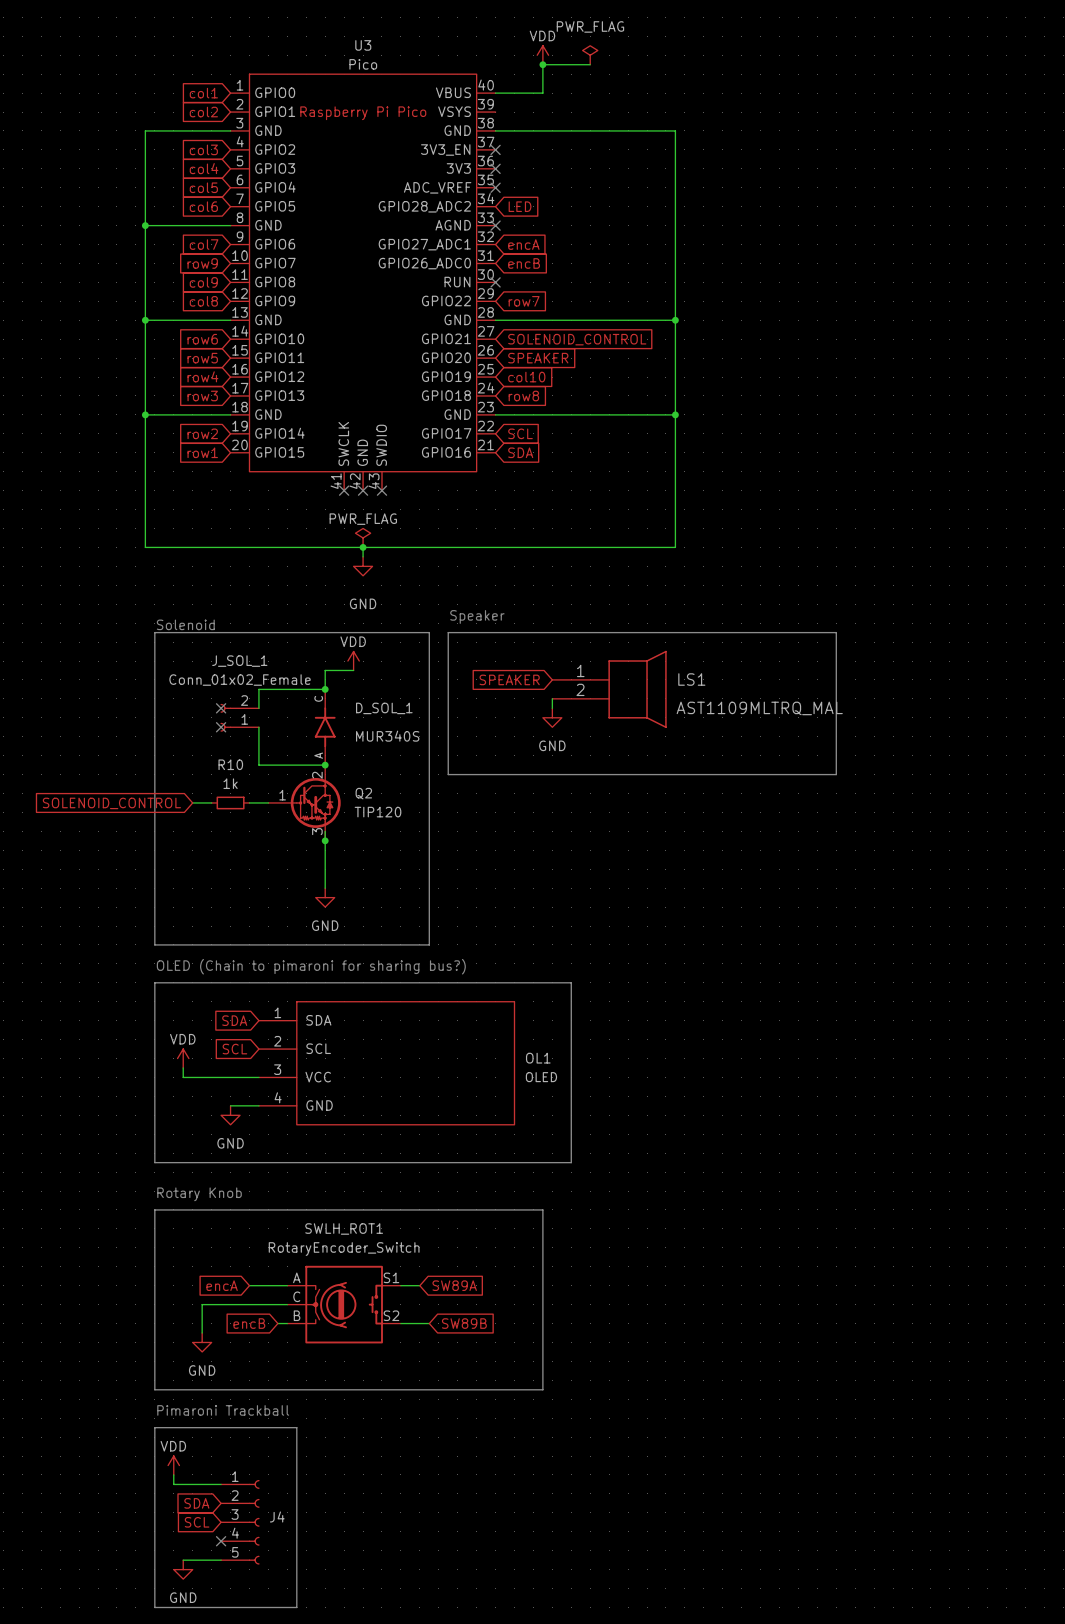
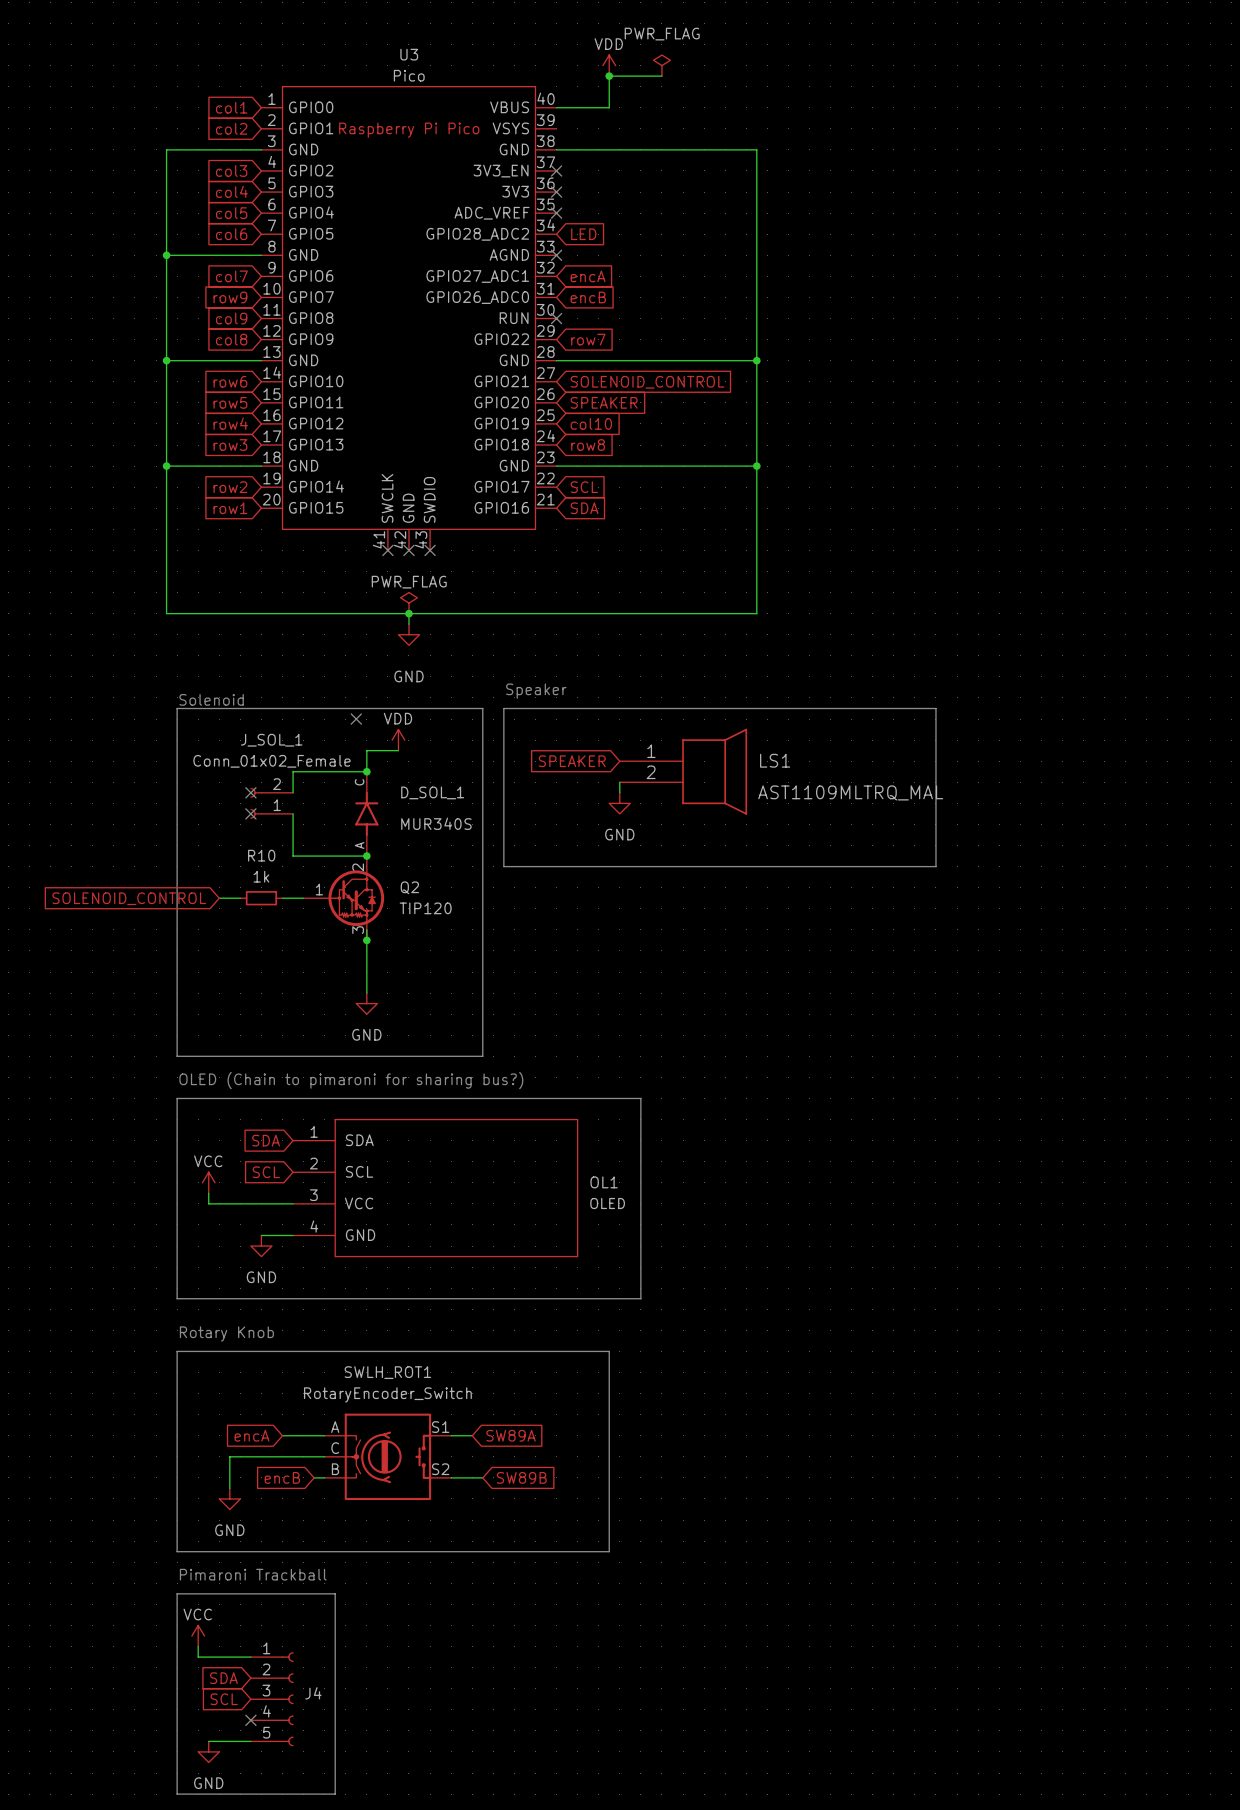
no-connect mark: none -> (356, 719)
power symbol: VDD (183, 1058) -> VCC (208, 1182)
power symbol: VDD (173, 1465) -> VCC (198, 1636)

